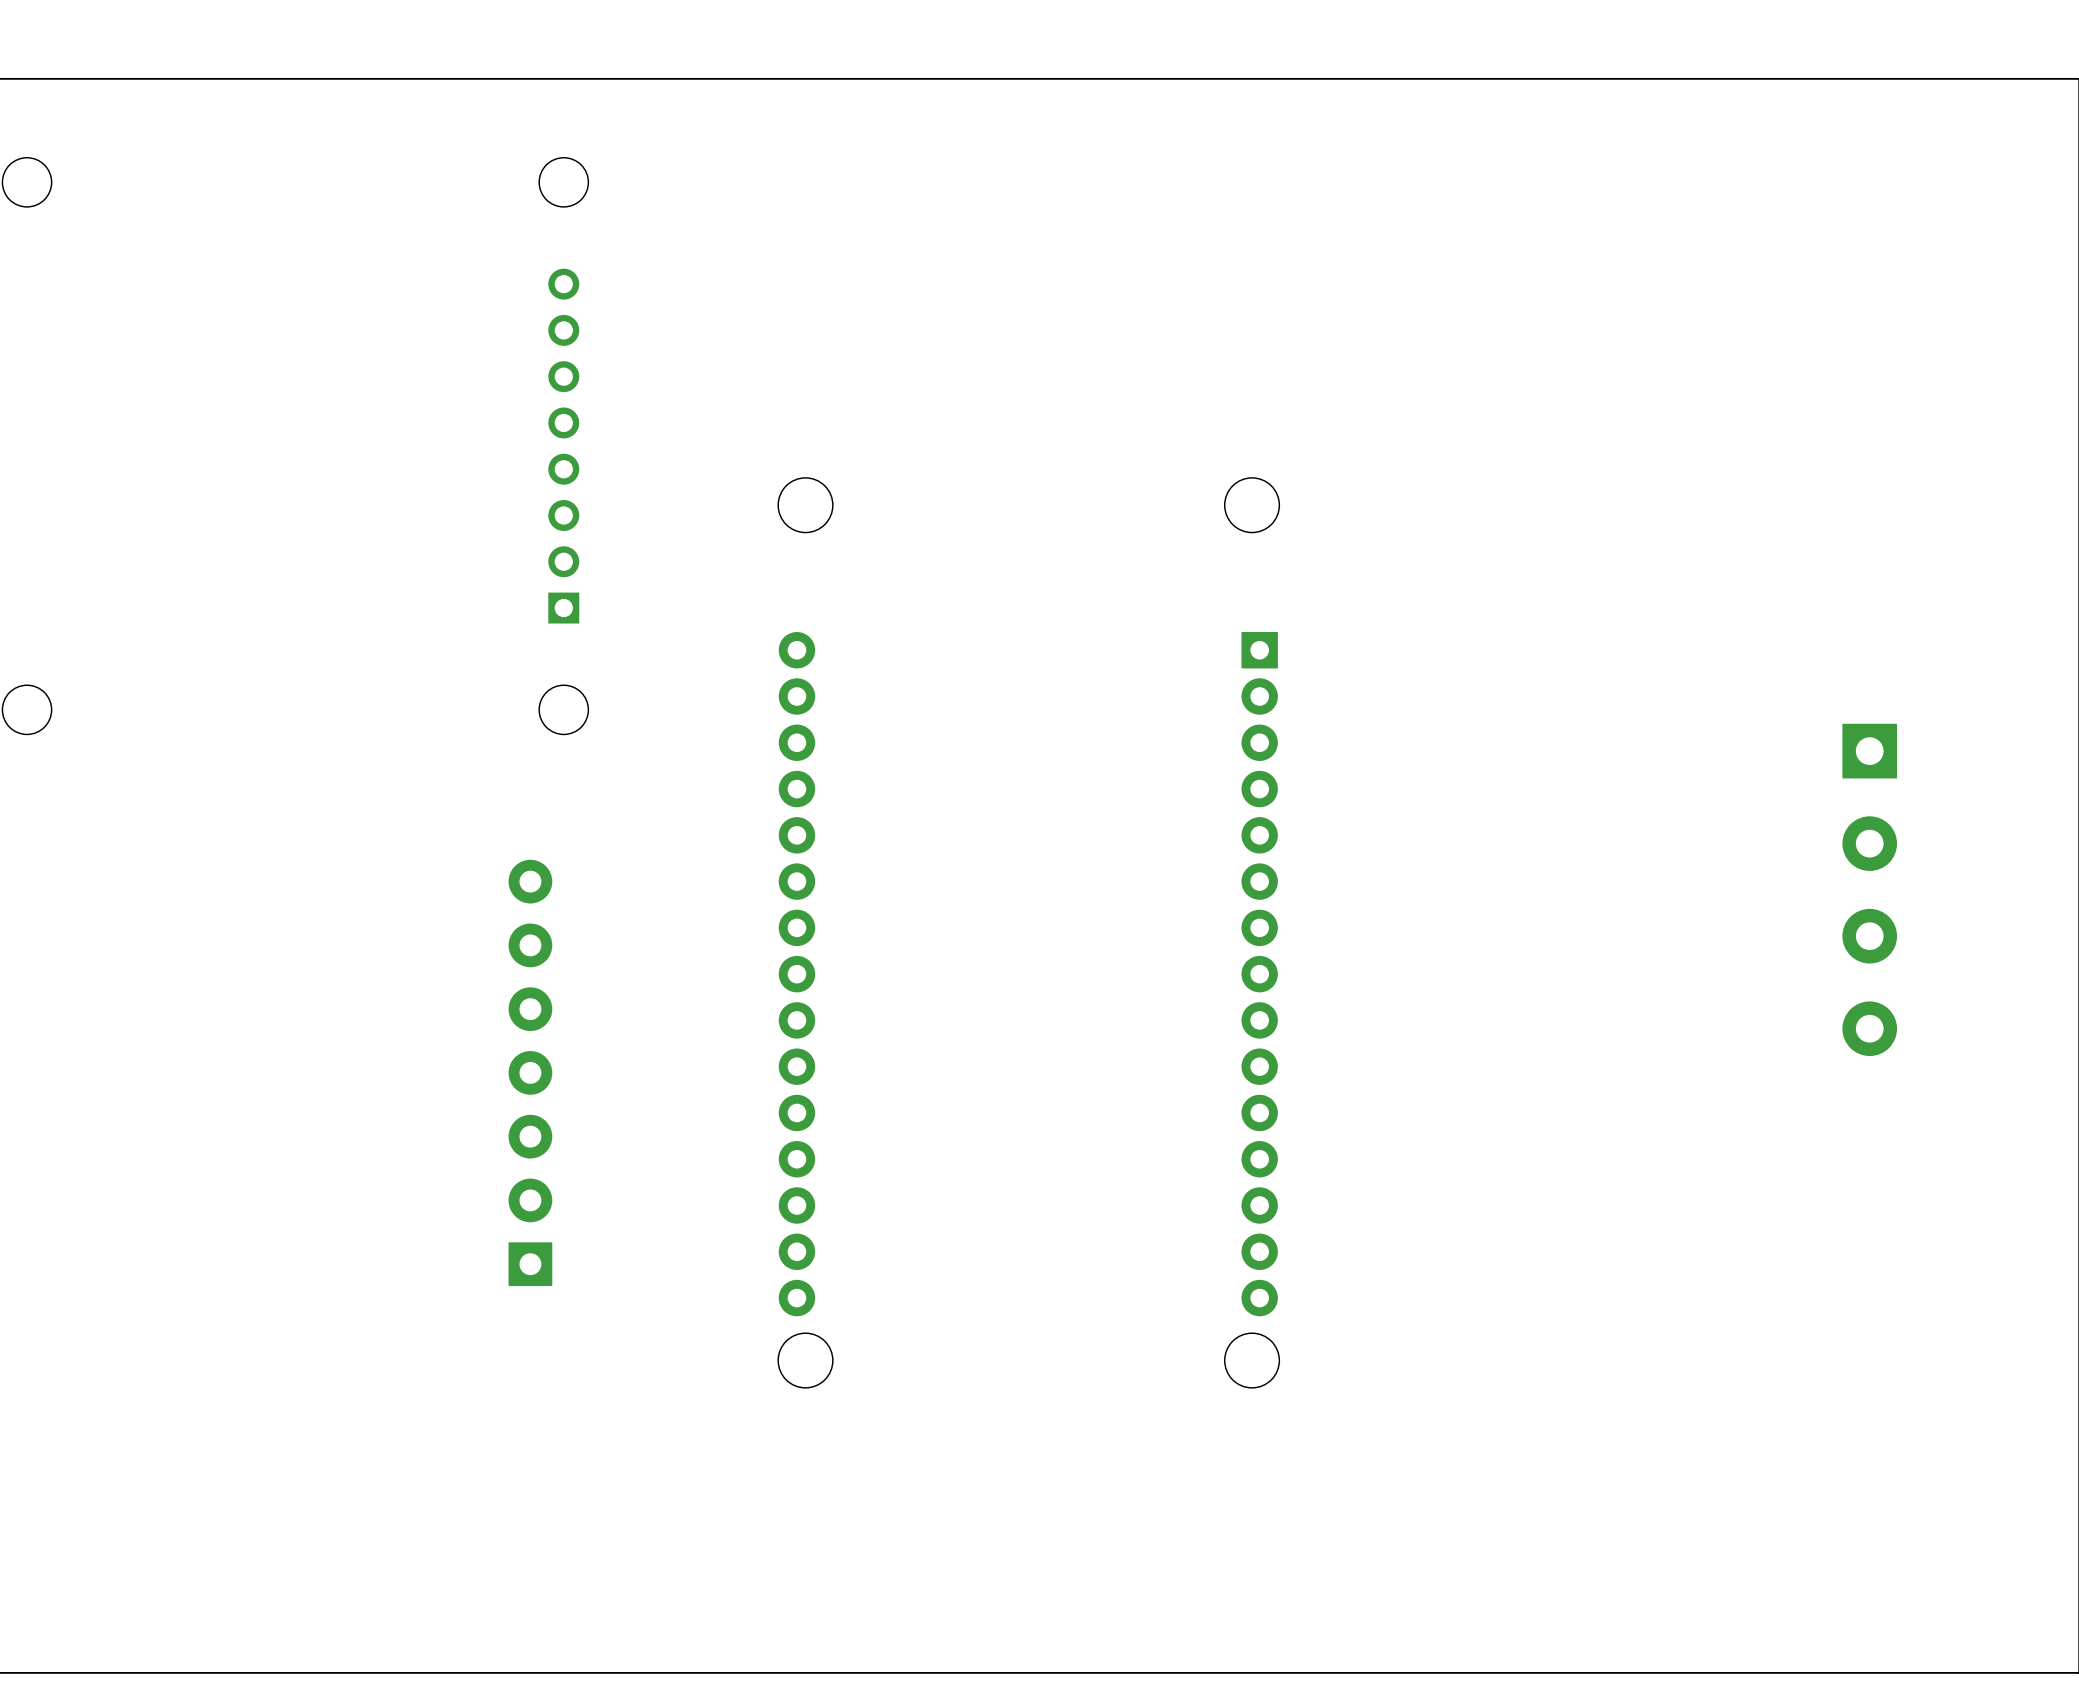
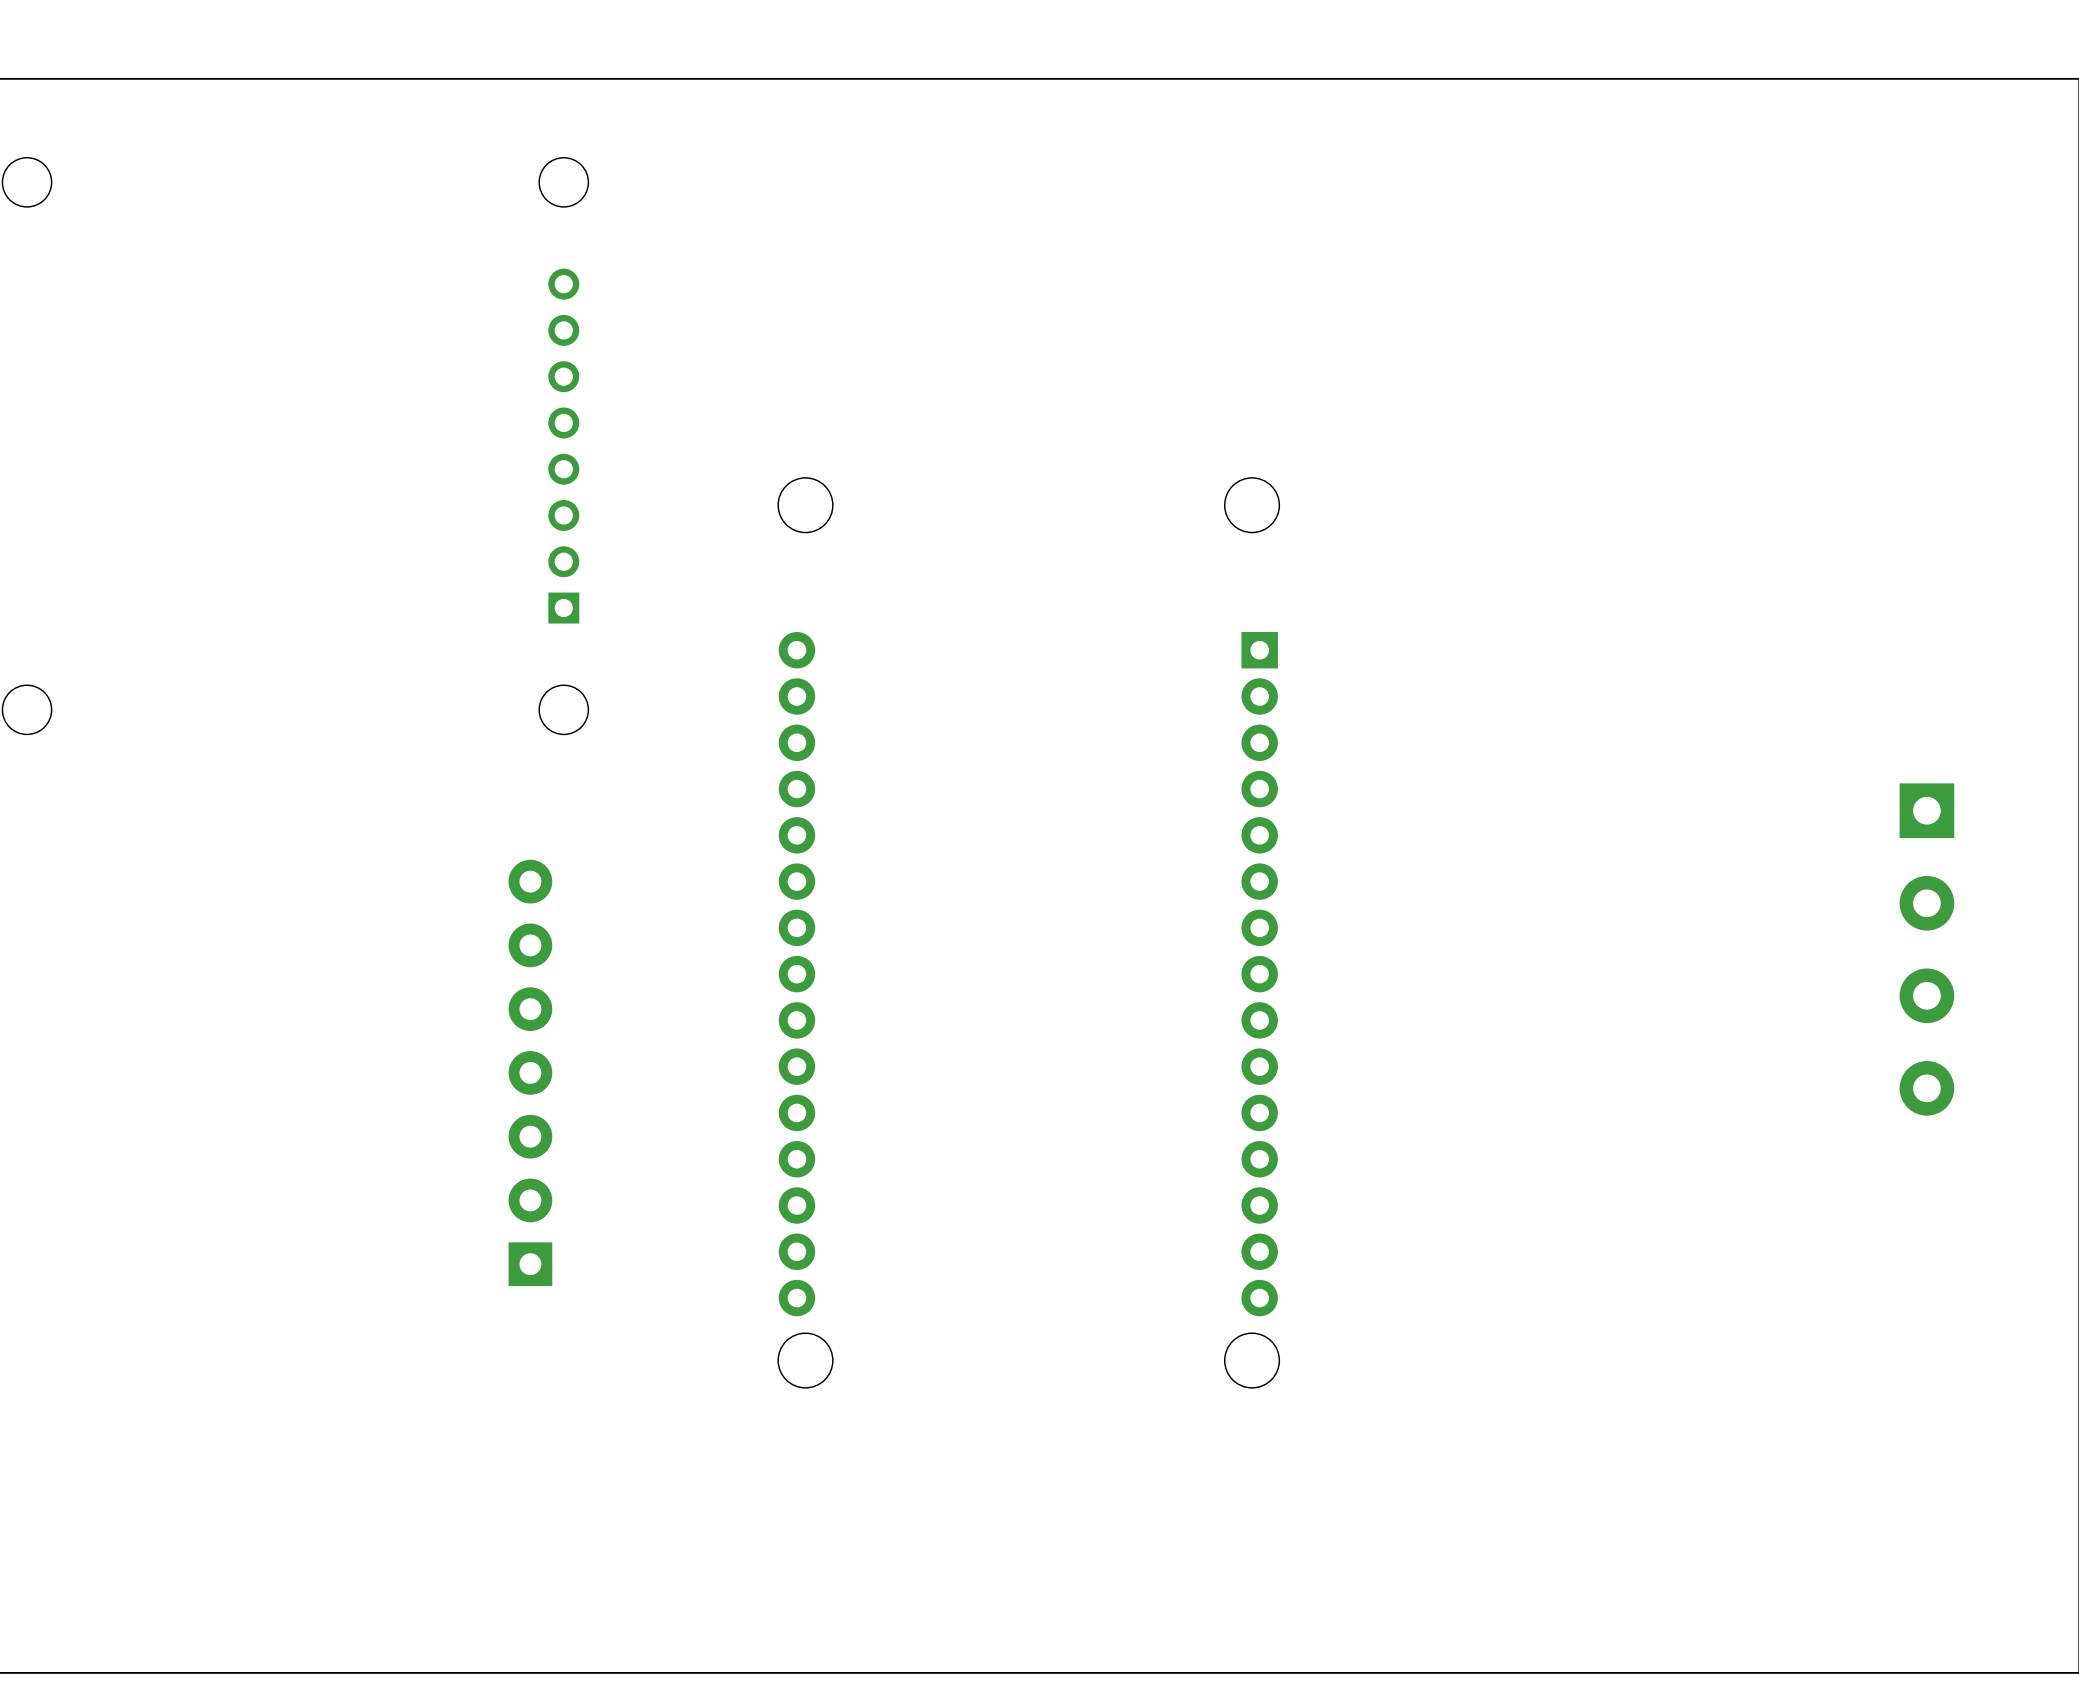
part position: (1869, 889) -> (1926, 949)

